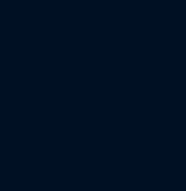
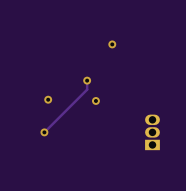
via: none -> (112, 44)
track: none -> (87, 80) (87, 89) (44, 132)
via: none -> (87, 80)
via: none -> (48, 99)
via: none -> (95, 100)
via: none -> (44, 132)
part: none -> (152, 132)

